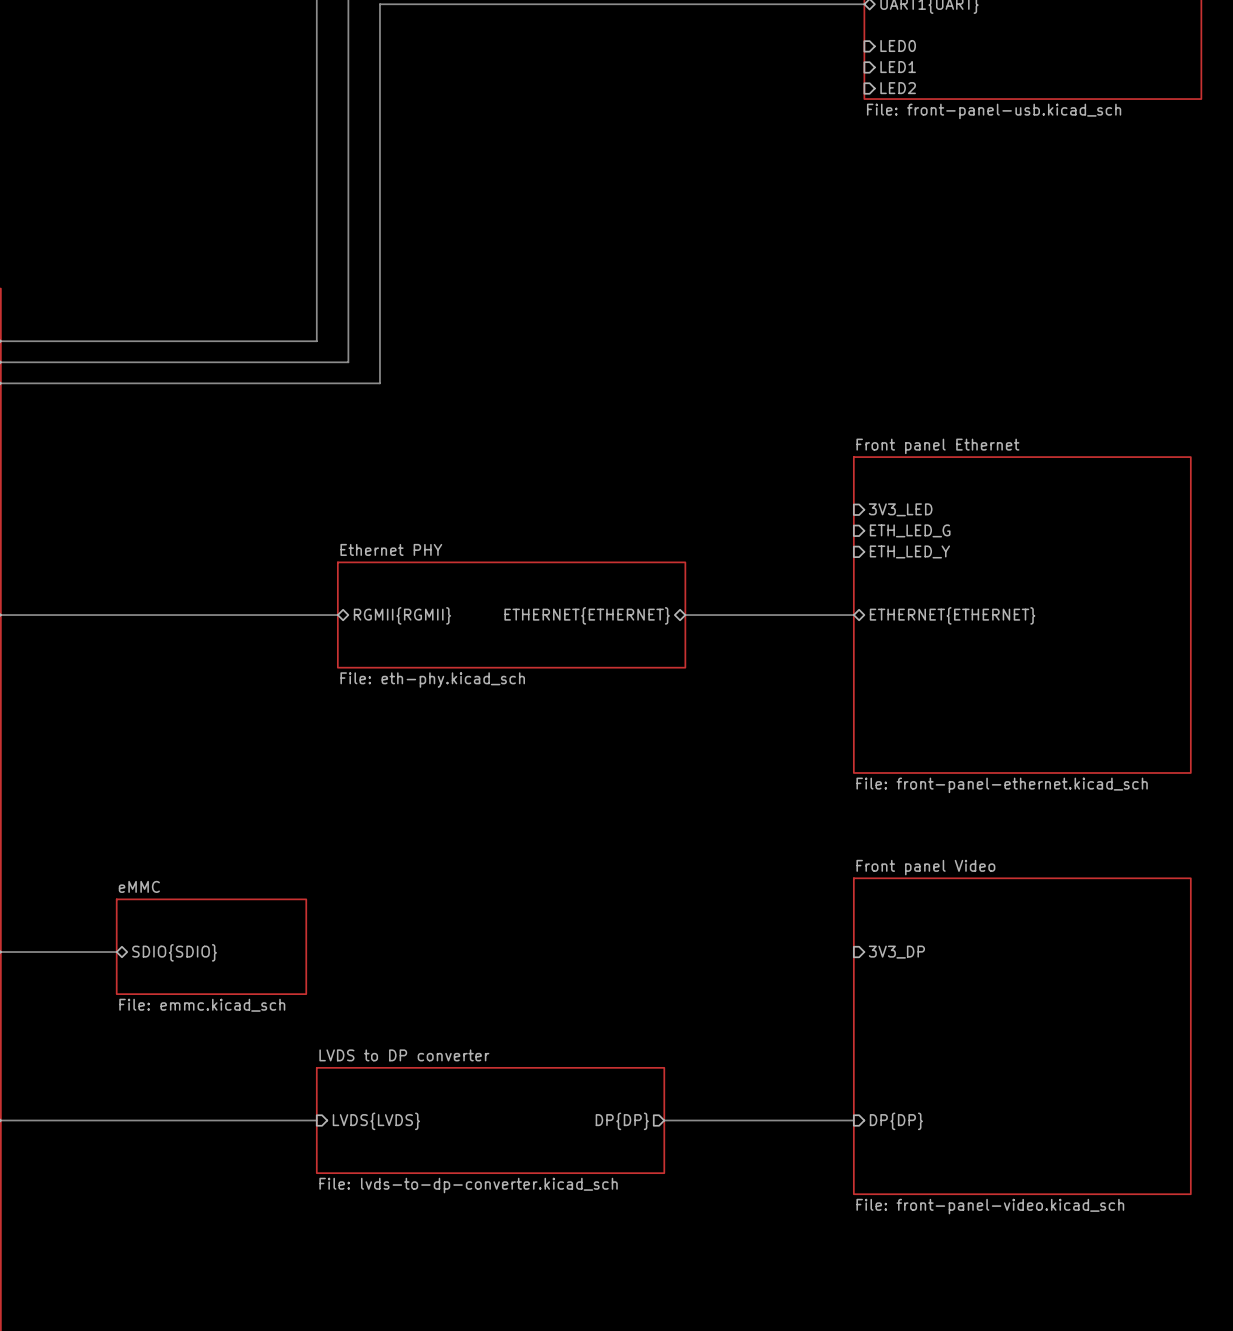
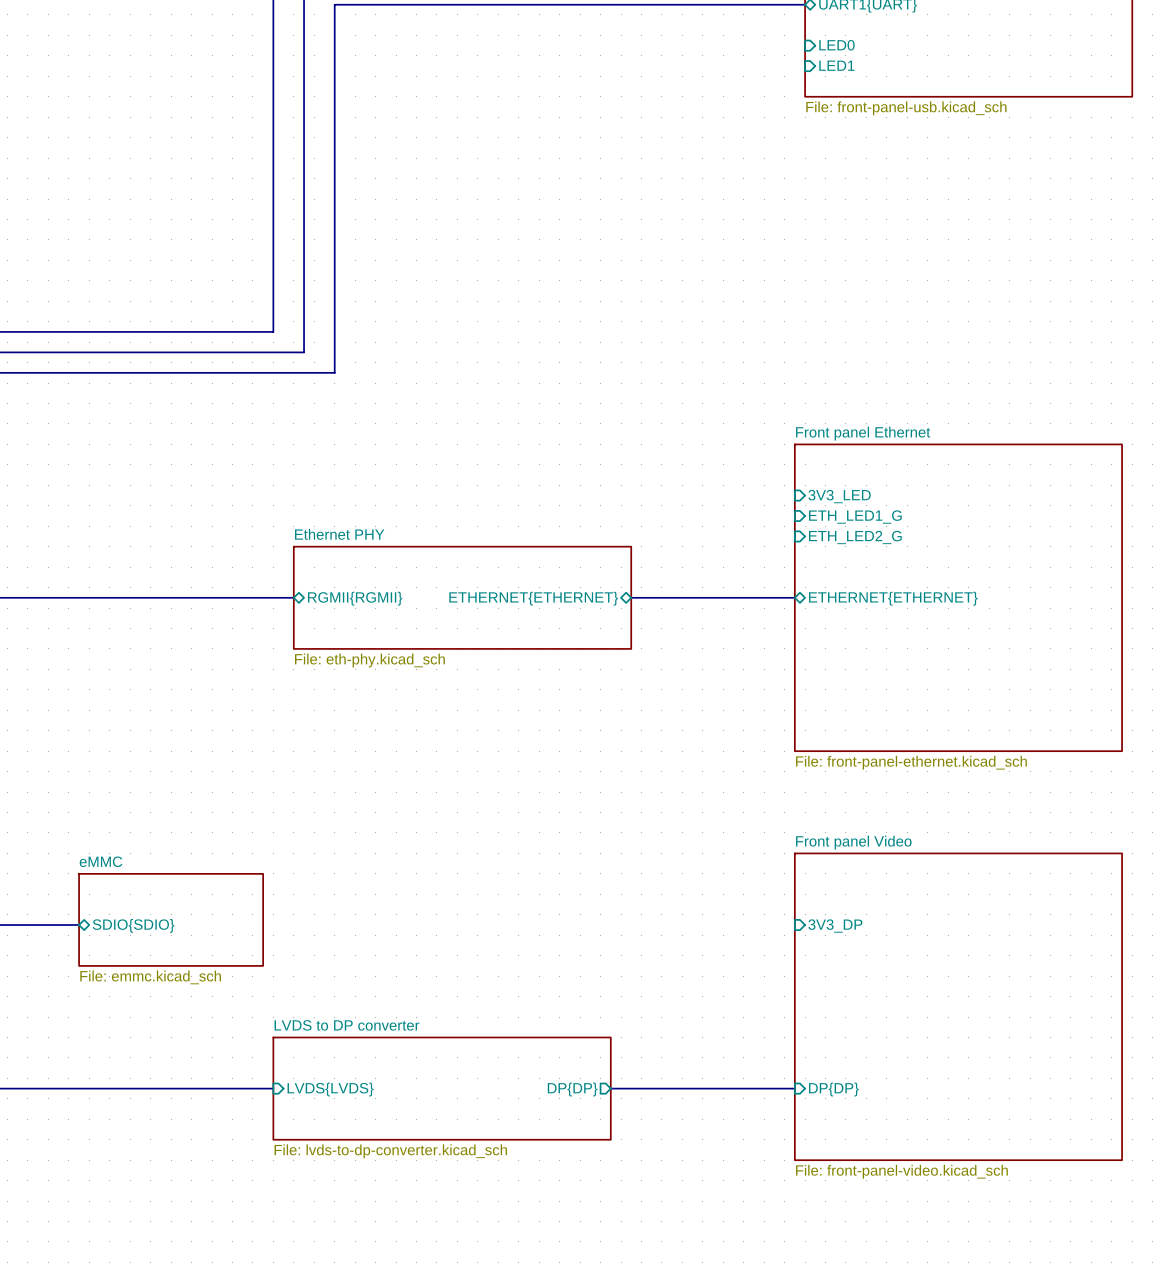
sheet pin: LED2 (898, 88) -> none
sheet pin: ETH_LED_G (910, 530) -> ETH_LED1_G (855, 517)
sheet pin: ETH_LED_Y (909, 551) -> ETH_LED2_G (855, 537)

